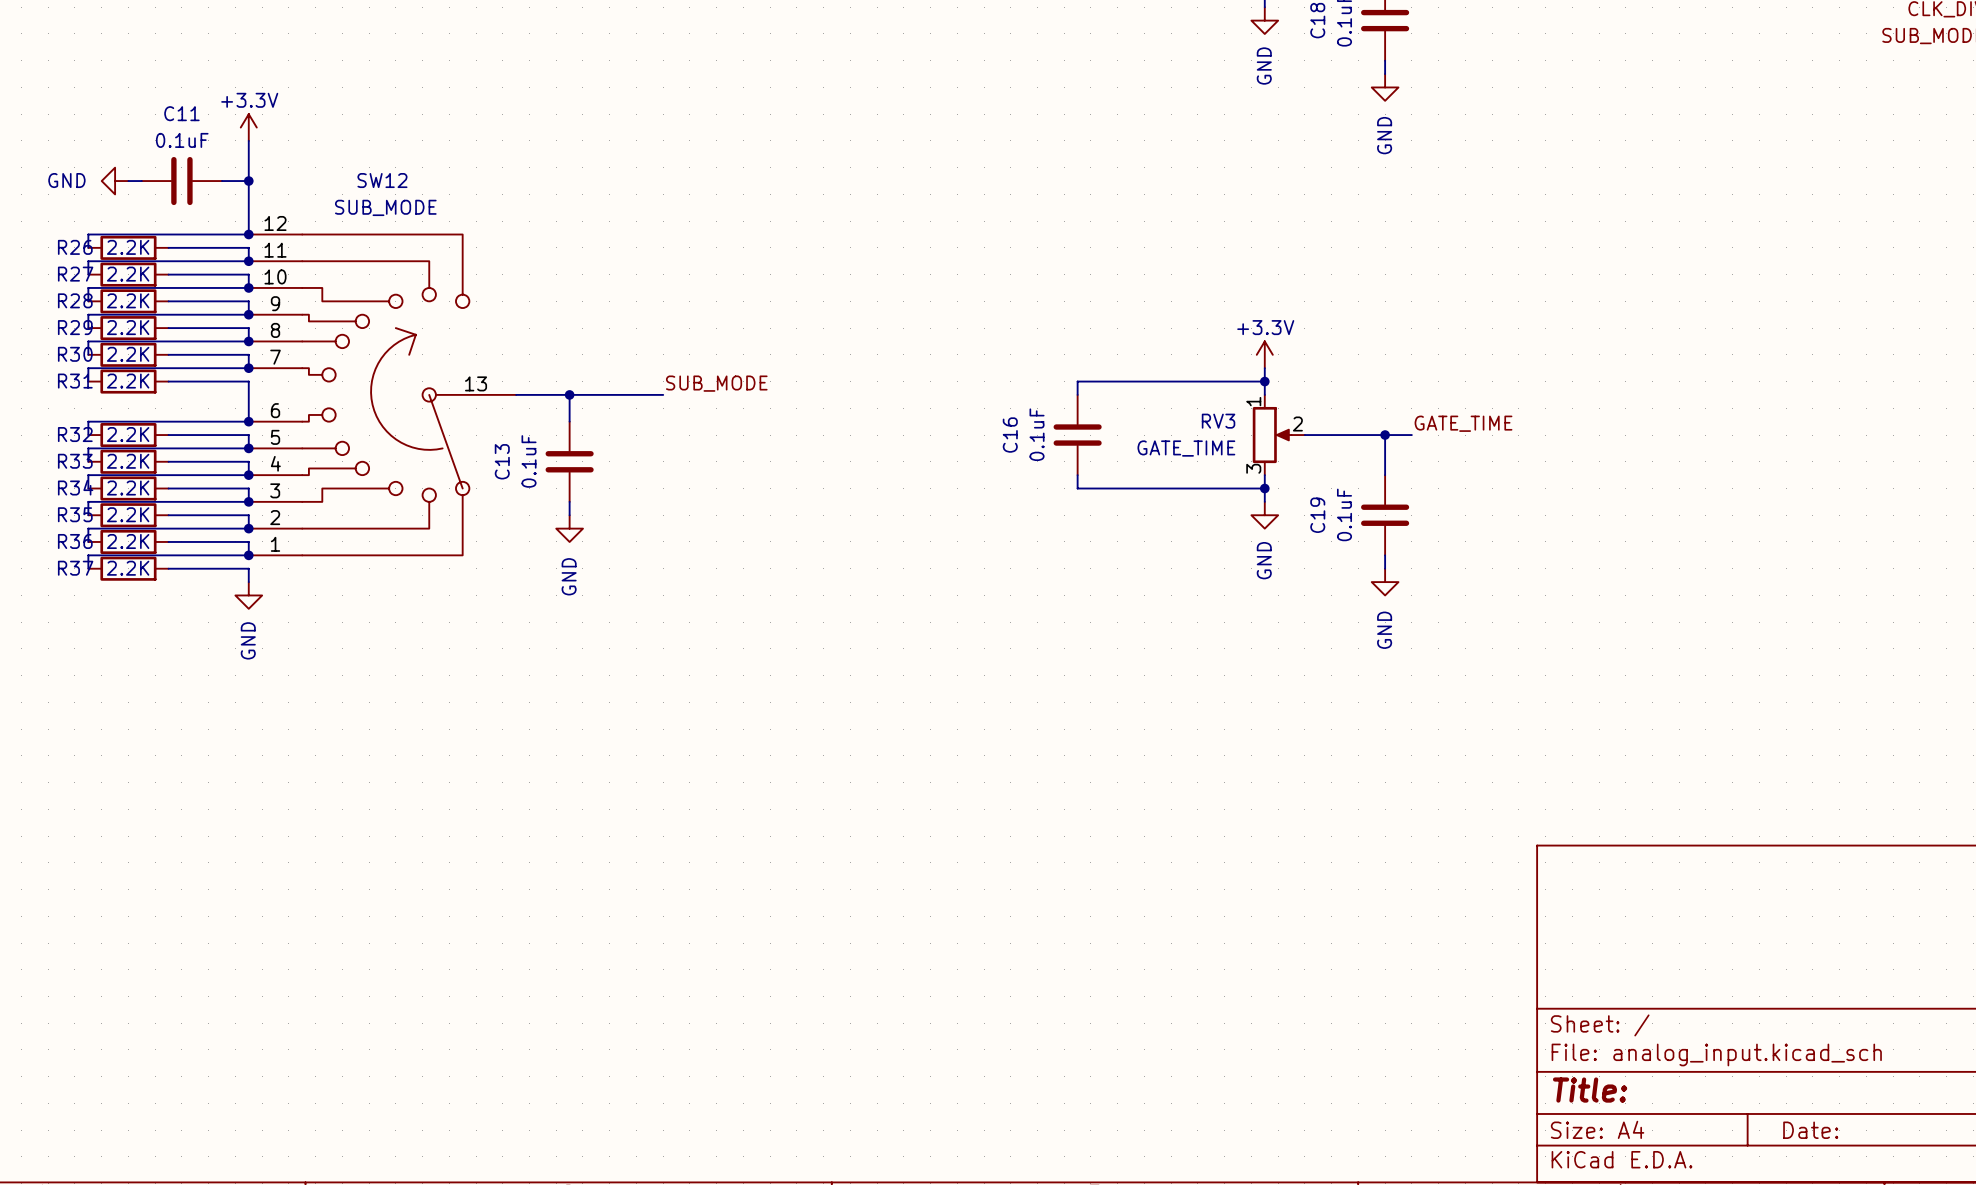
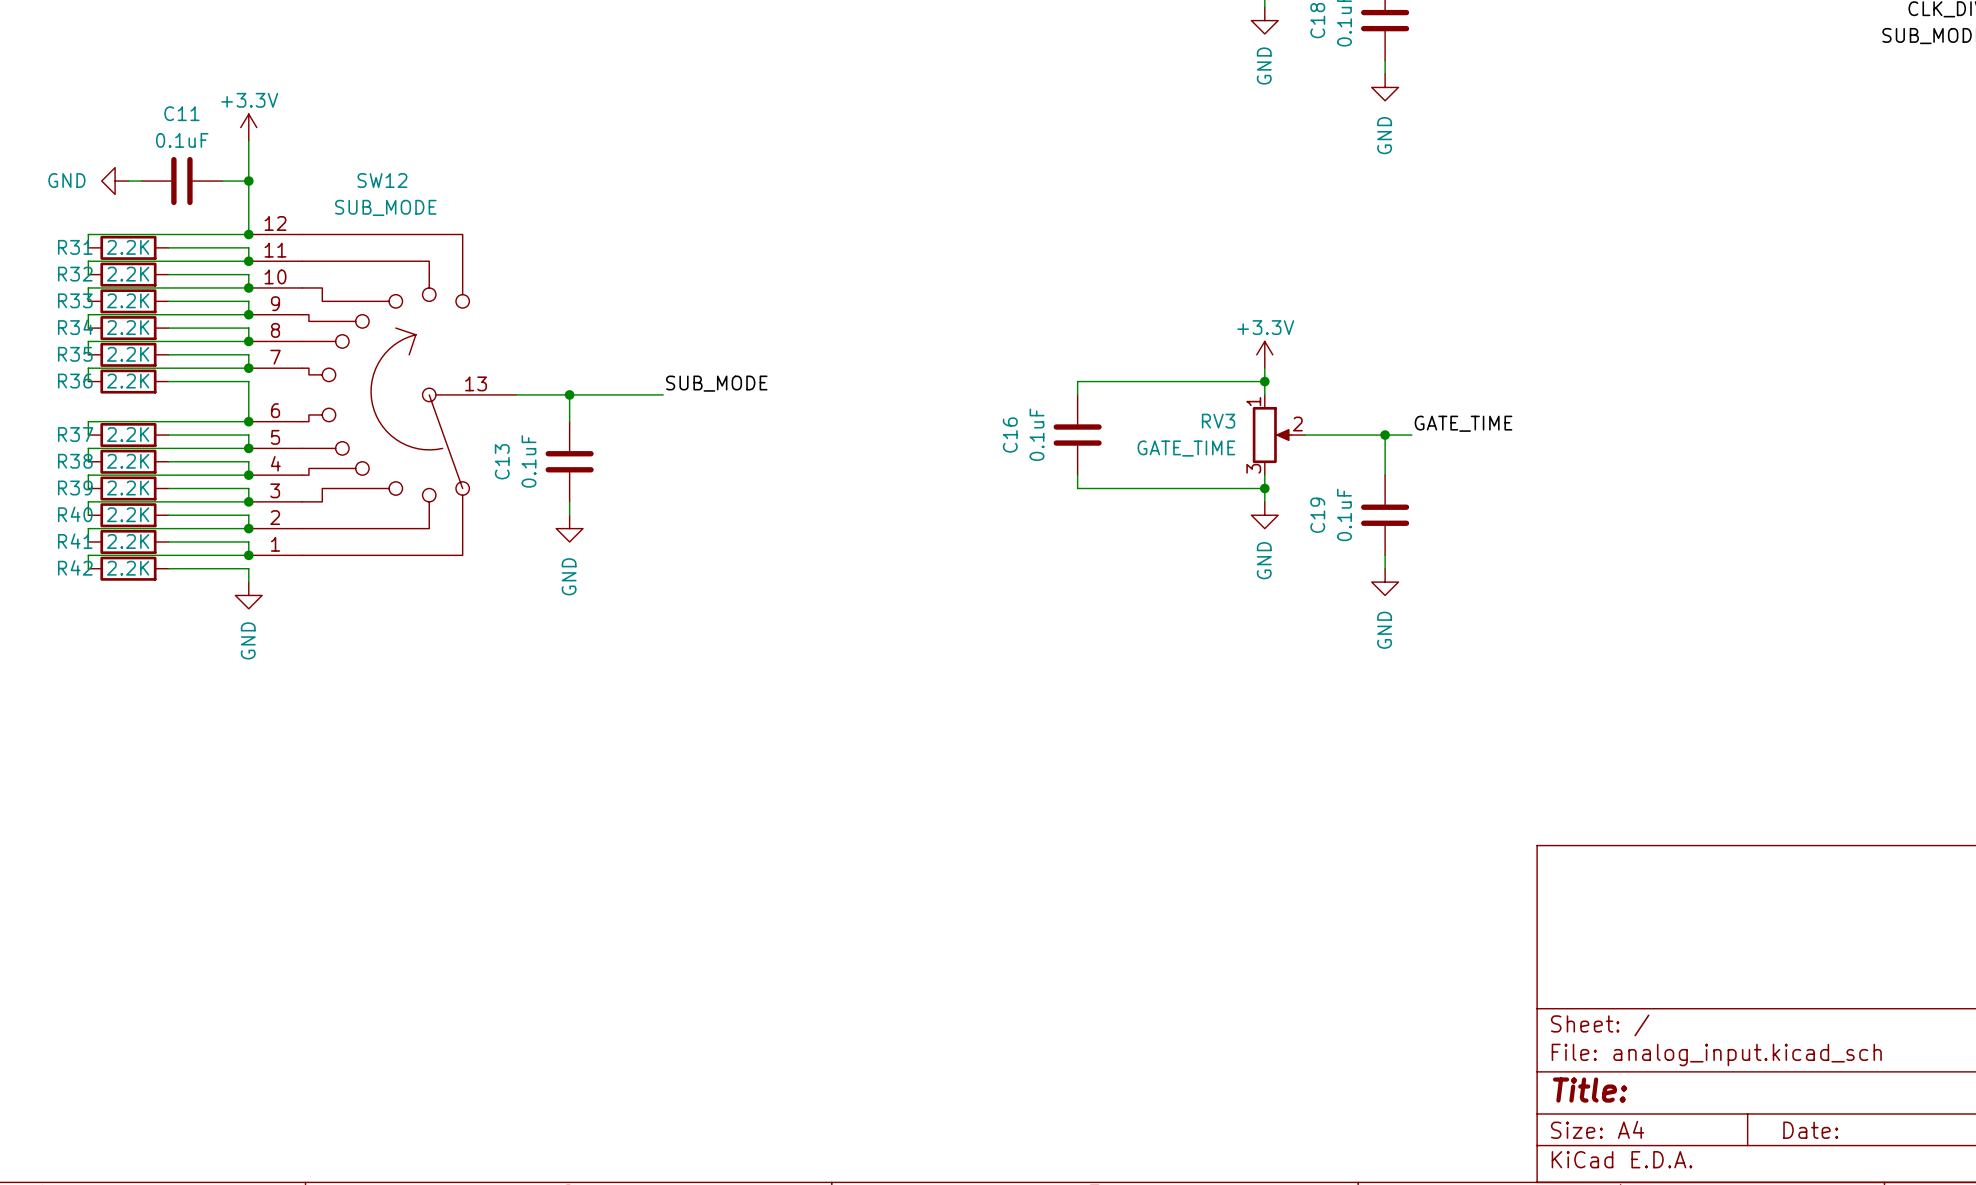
R26 name: R26 (75, 247) -> R31 (75, 247)
R27 name: R27 (75, 274) -> R32 (75, 274)
R28 name: R28 (75, 300) -> R33 (75, 300)
R29 name: R29 (75, 327) -> R34 (75, 327)
R30 name: R30 (75, 354) -> R35 (75, 354)
R31 name: R31 (75, 381) -> R36 (75, 381)
R32 name: R32 (75, 434) -> R37 (75, 434)
R33 name: R33 (75, 461) -> R38 (75, 461)
R34 name: R34 (75, 487) -> R39 (75, 488)
R35 name: R35 (75, 514) -> R40 (75, 514)
R36 name: R36 (75, 541) -> R41 (75, 541)
R37 name: R37 (75, 568) -> R42 (75, 567)

